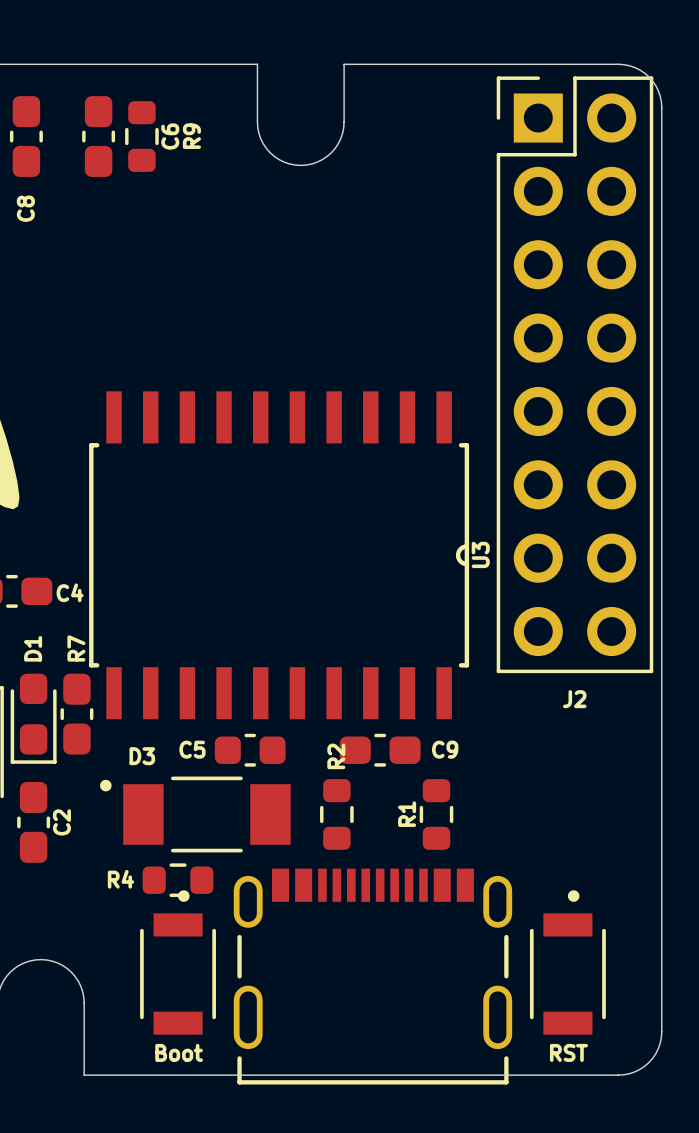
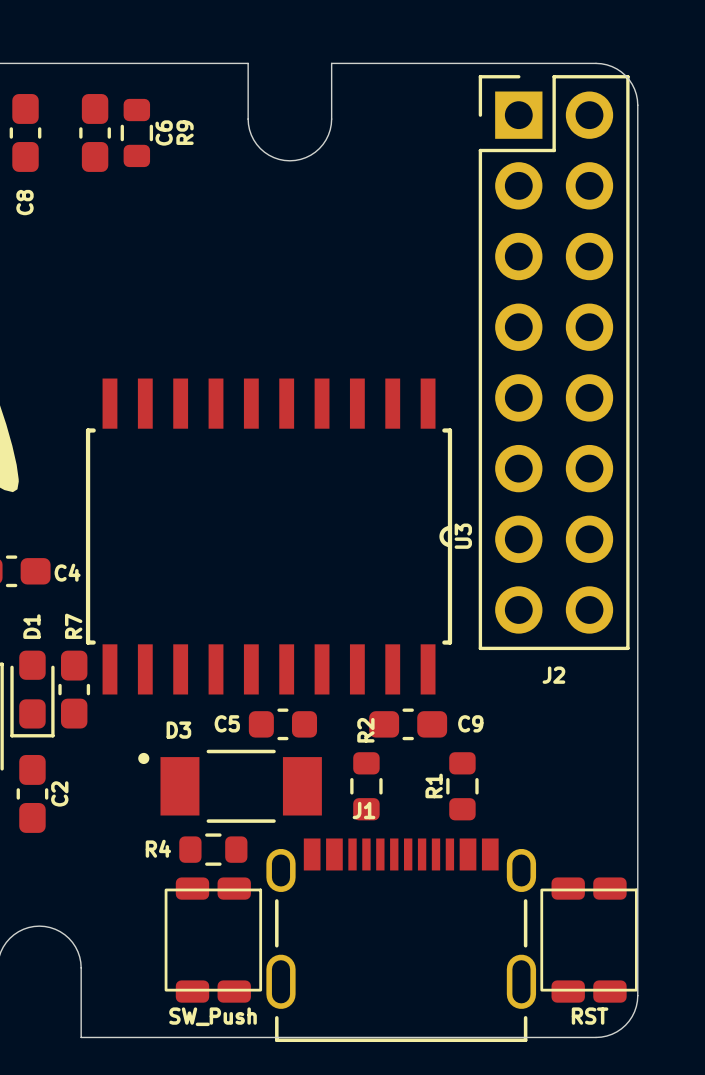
C5 position: (250, 750) -> (282, 724)
C9 position: (380, 750) -> (408, 724)
D3 position: (195, 814) -> (230, 786)
R2 position: (336, 814) -> (366, 786)
R1 position: (436, 814) -> (462, 786)
R4 position: (178, 880) -> (213, 849)
part: Boot (178, 962) -> none
part: RST (567, 962) -> none
part: none -> SW_Push (213, 940)
J1: none -> (401, 940)
part: none -> RST (589, 940)
part: (372, 976) -> none

